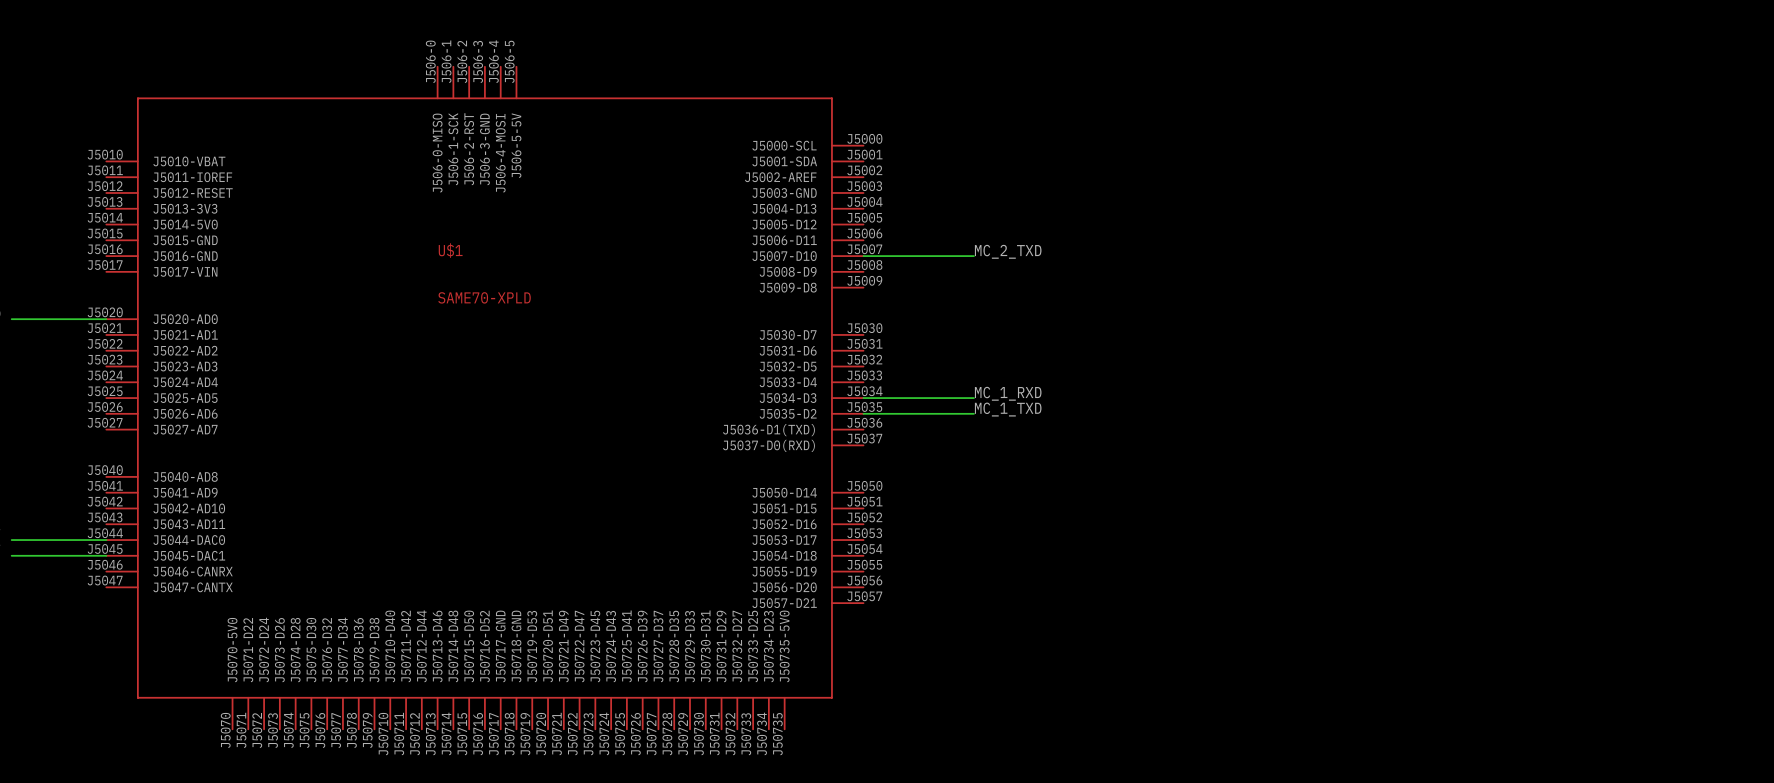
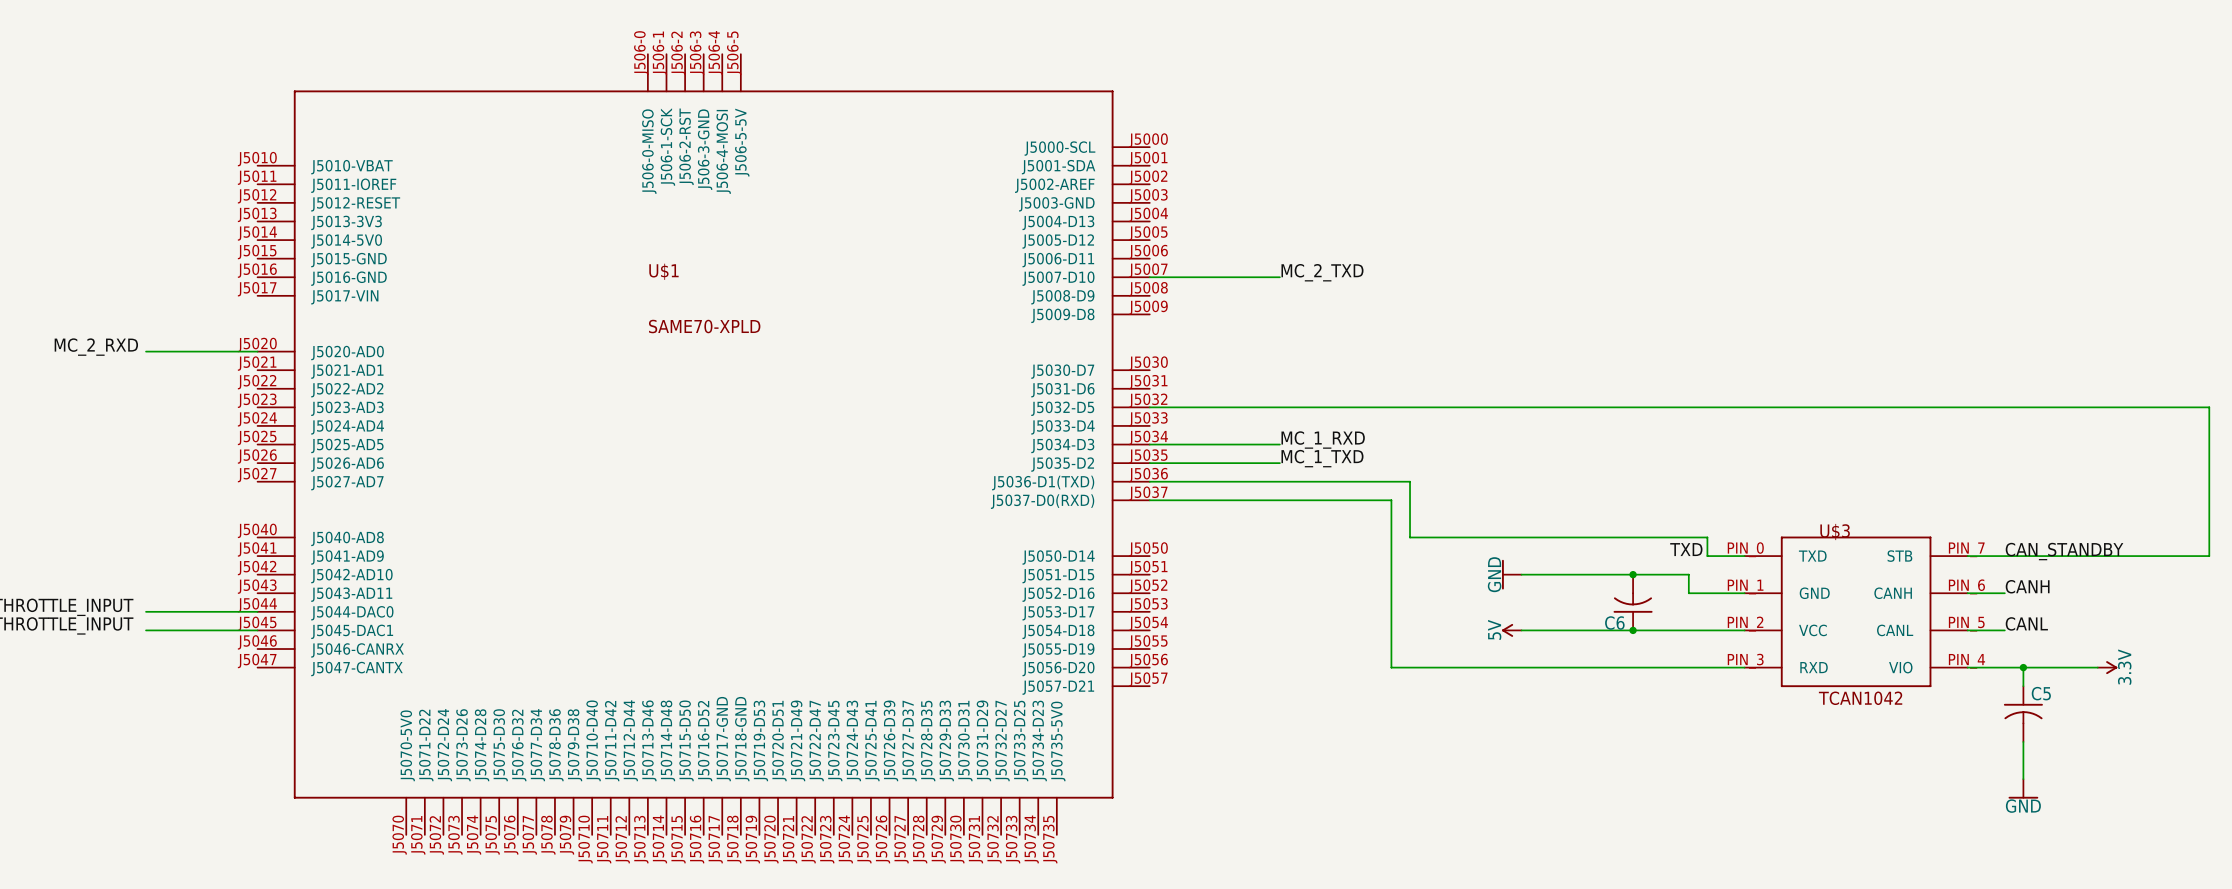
wire: none -> (1149, 407) (2209, 407) (2209, 556) (1967, 556)
wire: none -> (1149, 481) (1410, 481) (1410, 537) (1707, 537) (1707, 556) (1744, 556)
wire: none -> (1149, 500) (1391, 500) (1391, 667) (1744, 667)
label: none -> TXD (1686, 549)
label: none -> CAN_STANDBY (2064, 551)
power symbol: none -> GND (1511, 574)
wire: none -> (1521, 574) (1688, 574) (1688, 593) (1744, 593)
junction: none -> (1633, 574)
label: none -> CANH (2027, 586)
wire: none -> (1967, 593) (2004, 593)
C6: none -> (1633, 602)
U$3: none -> TCAN1042 (1856, 611)
label: none -> CANL (2026, 623)
power symbol: none -> 5V (1511, 630)
wire: none -> (1521, 630) (1744, 630)
junction: none -> (1633, 630)
wire: none -> (1967, 630) (2004, 630)
wire: none -> (1967, 667) (2097, 667)
wire: none -> (2023, 667) (2023, 686)
junction: none -> (2023, 667)
power symbol: none -> 3.3V (2107, 667)
C5: none -> (2023, 714)
wire: none -> (2023, 741) (2023, 779)
power symbol: none -> GND (2023, 788)

